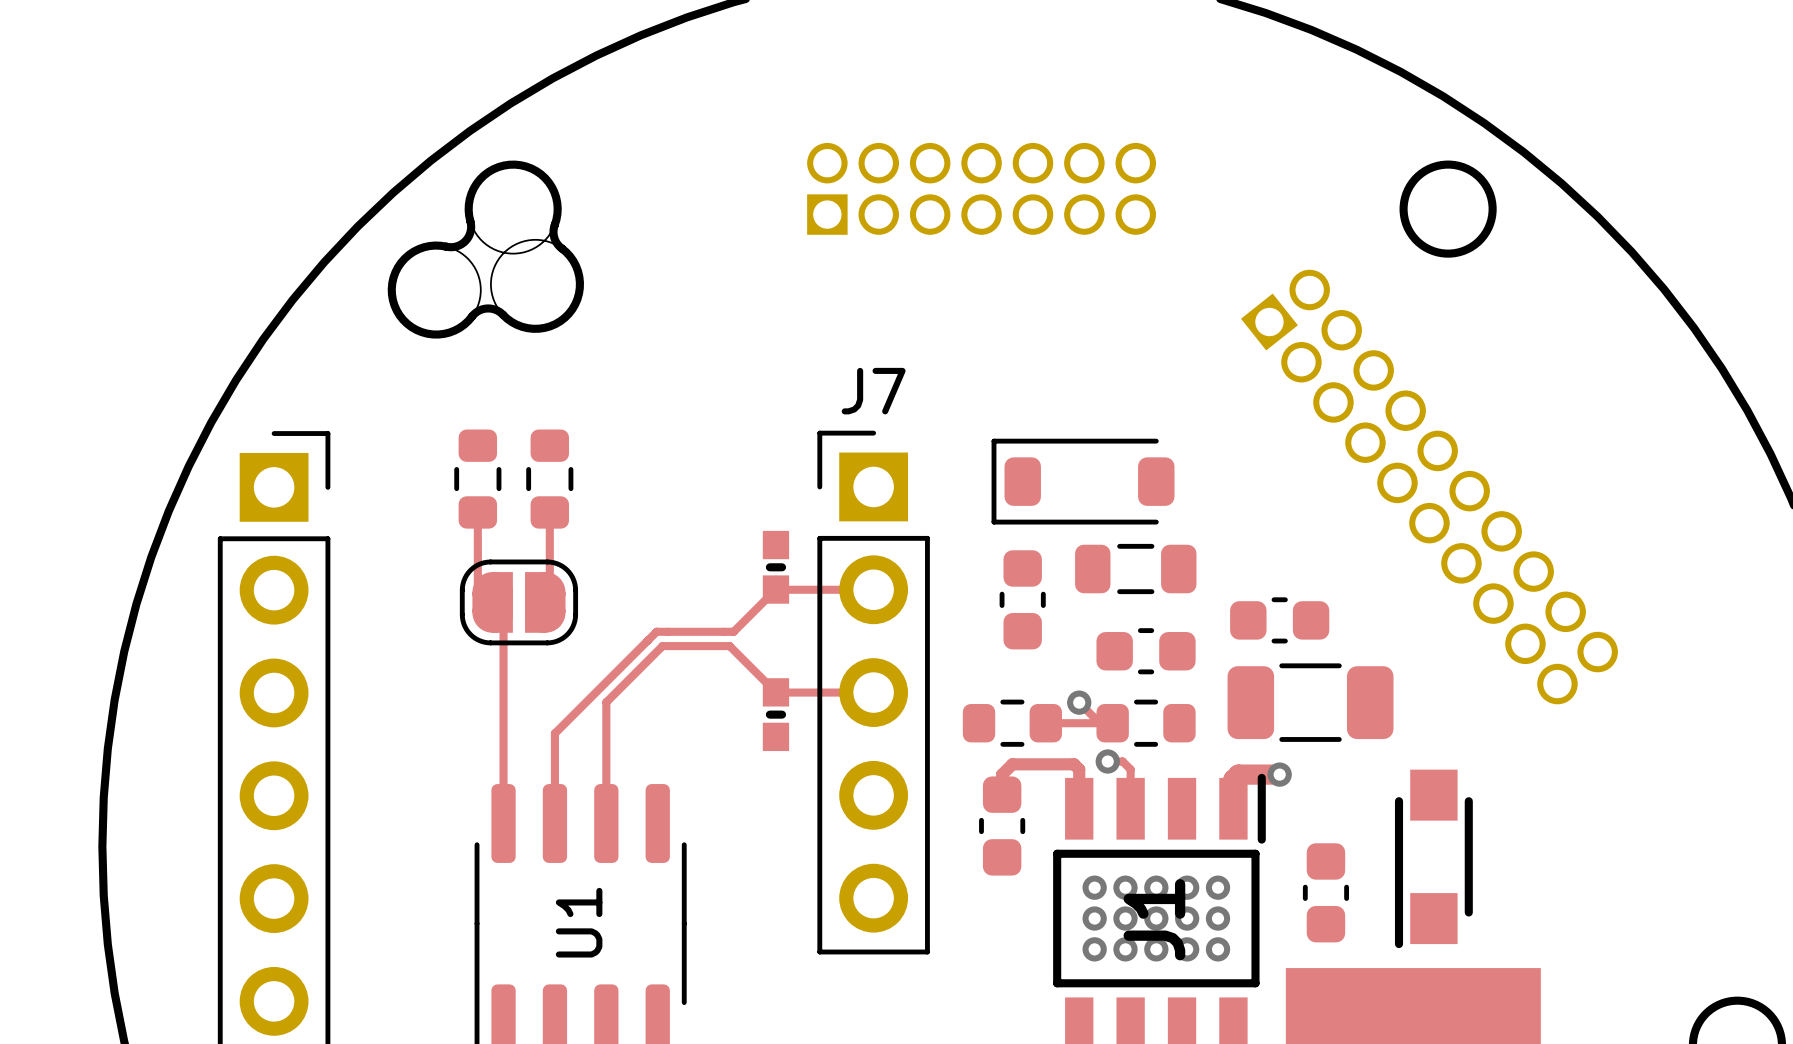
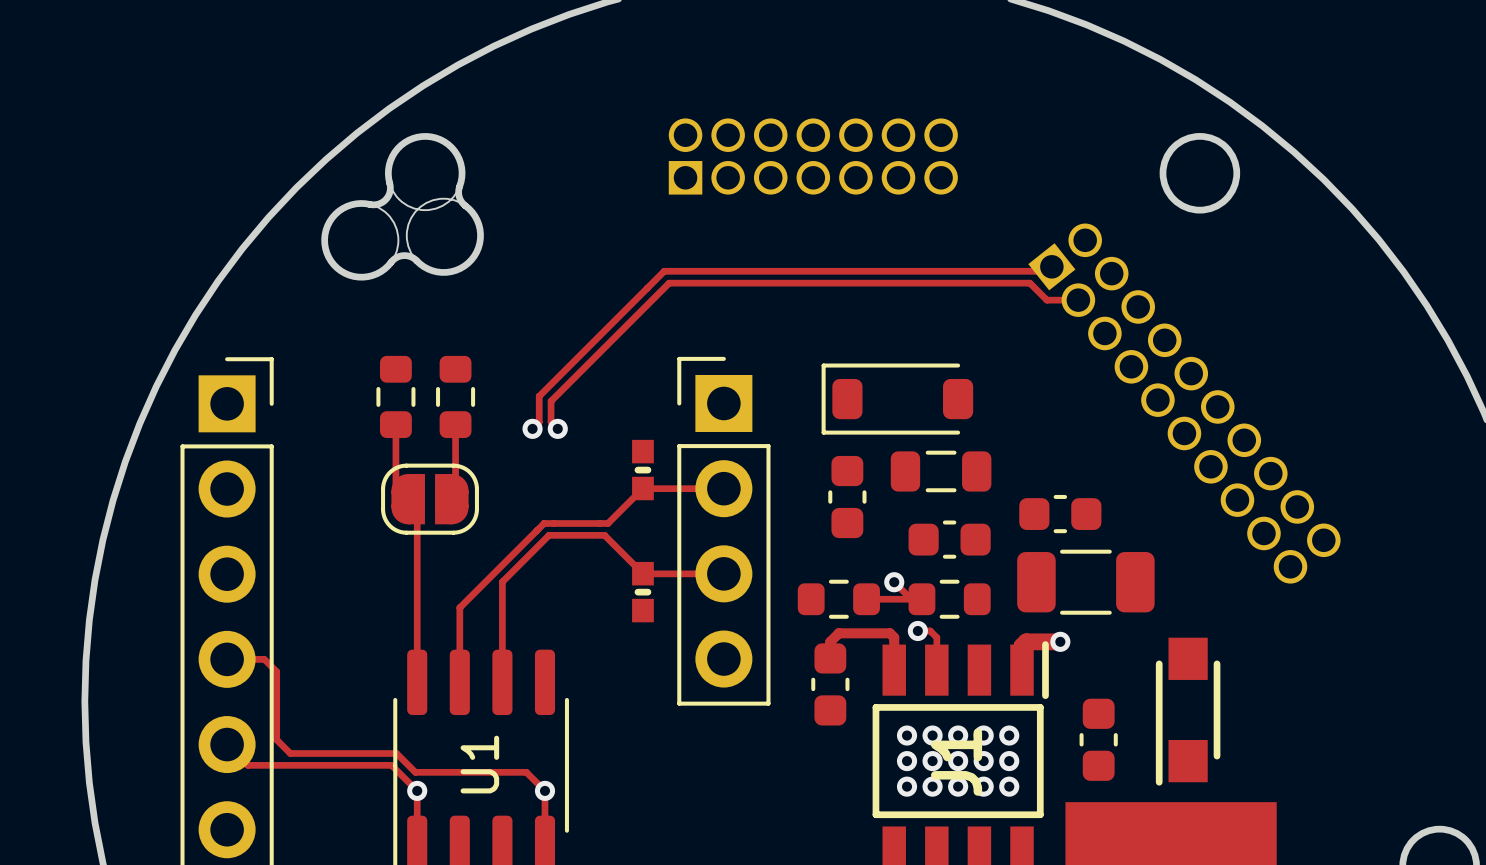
track: none -> (1051, 266) (1047, 271) (664, 271) (539, 396) (539, 422) (532, 428)
track: none -> (1078, 300) (1046, 300) (1029, 283) (669, 283) (551, 401) (551, 422) (557, 428)
via: none -> (532, 428)
via: none -> (557, 428)
part: none -> (723, 531)
J7: (873, 692) -> none
track: none -> (227, 659) (264, 659) (276, 671) (276, 739) (290, 753) (396, 753) (415, 772) (526, 772) (545, 790) (545, 848)
track: none -> (227, 744) (247, 765) (391, 765) (417, 790) (417, 848)
via: none -> (417, 790)
via: none -> (545, 790)

